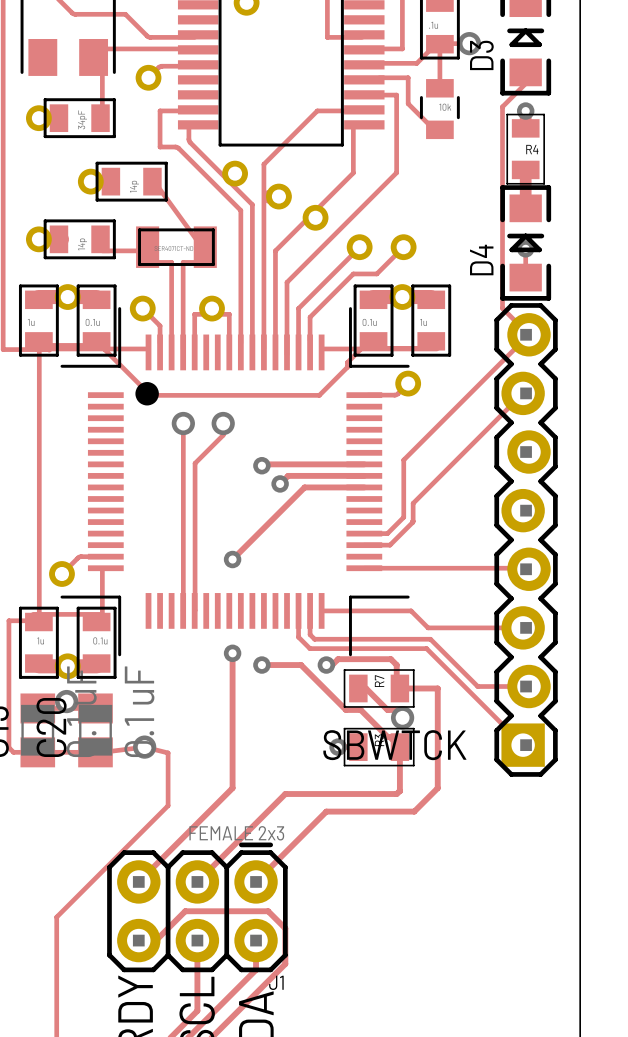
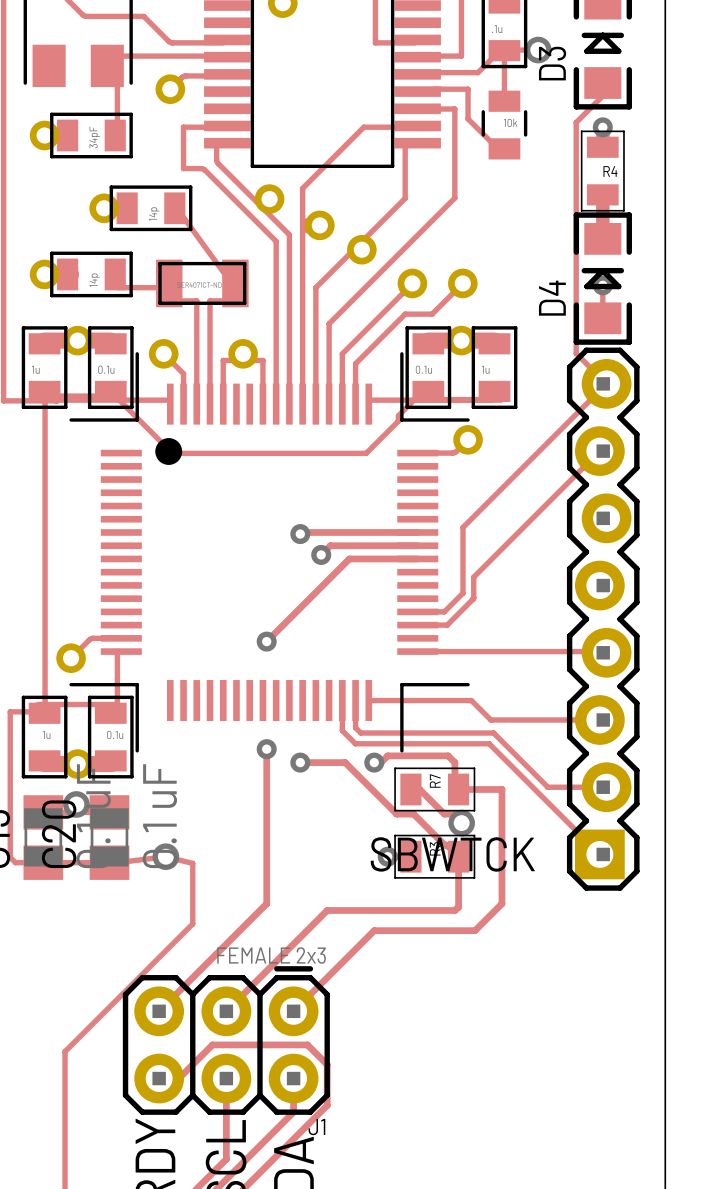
track: (183, 423) (183, 610) -> none
via: (183, 423) -> none
track: (223, 423) (223, 435) (195, 463) (194, 610) -> none
via: (223, 423) -> none

